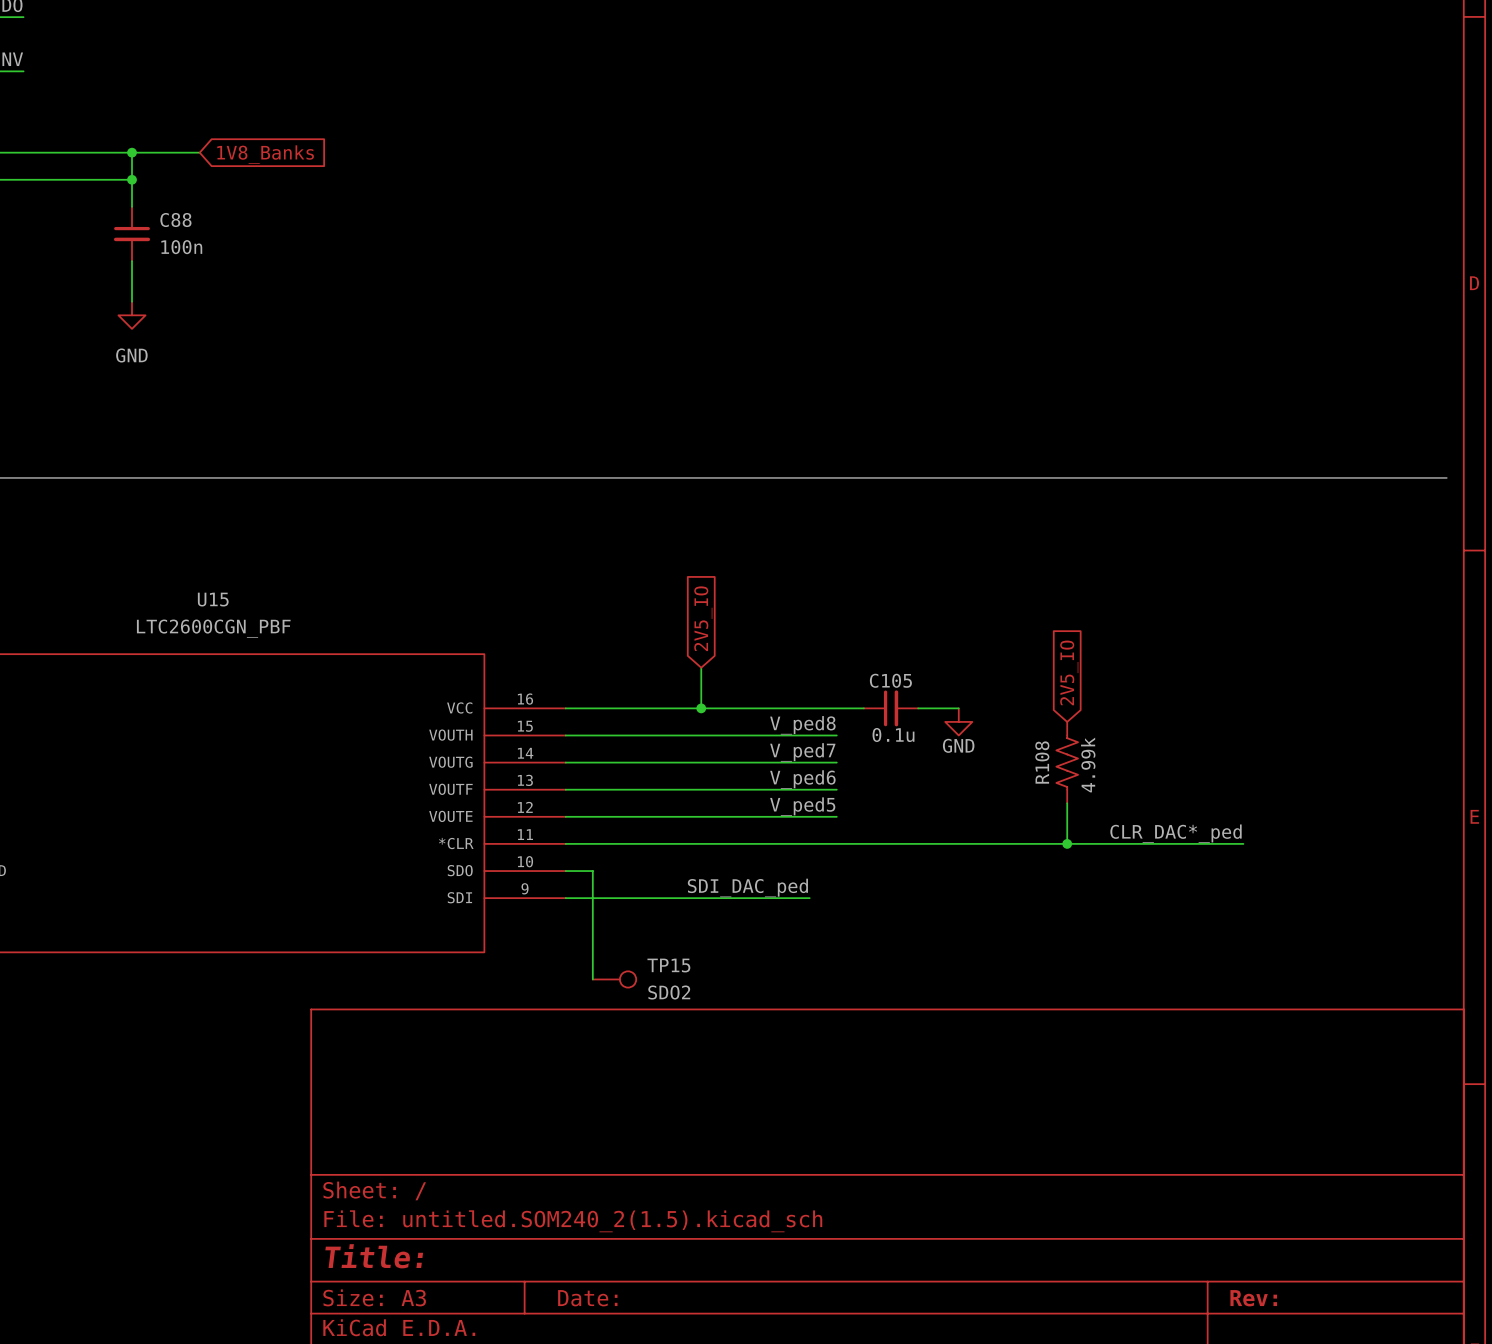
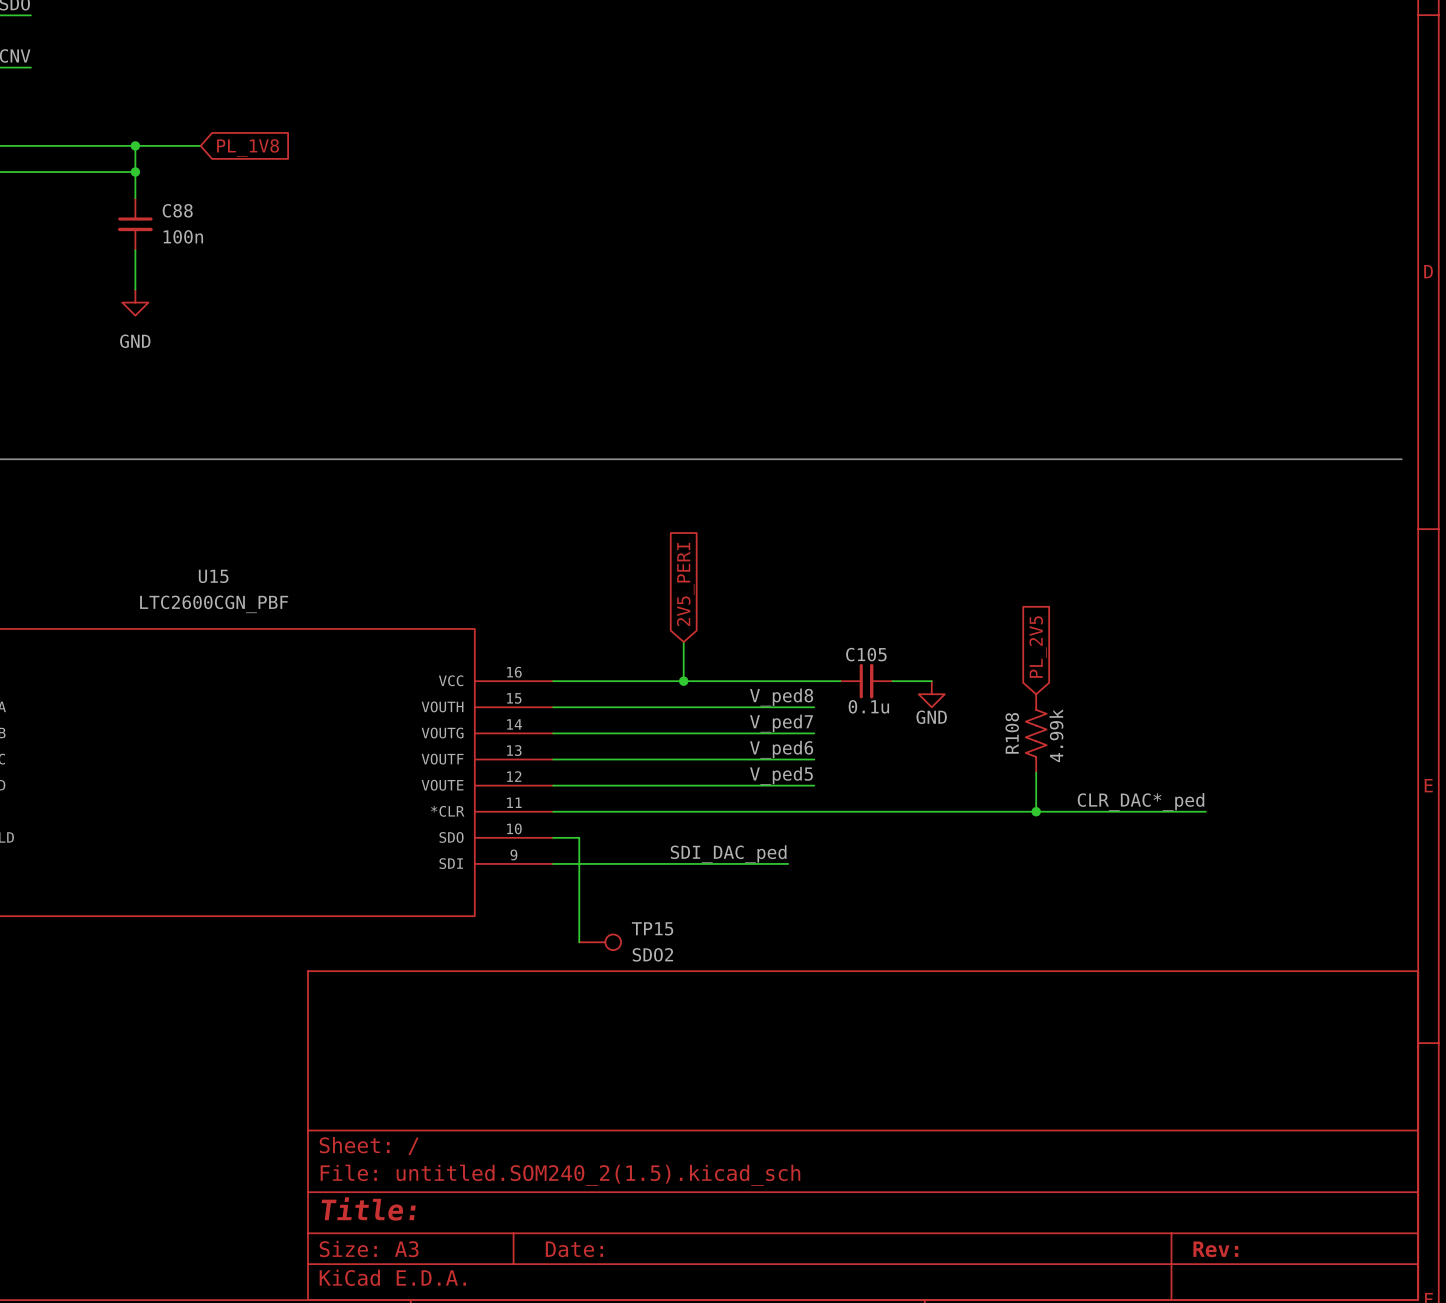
global label: 1V8_Banks (265, 154) -> PL_1V8 (247, 147)
global label: 2V5_IO (703, 618) -> 2V5_PERI (685, 584)
global label: 2V5_IO (1069, 672) -> PL_2V5 (1038, 647)

